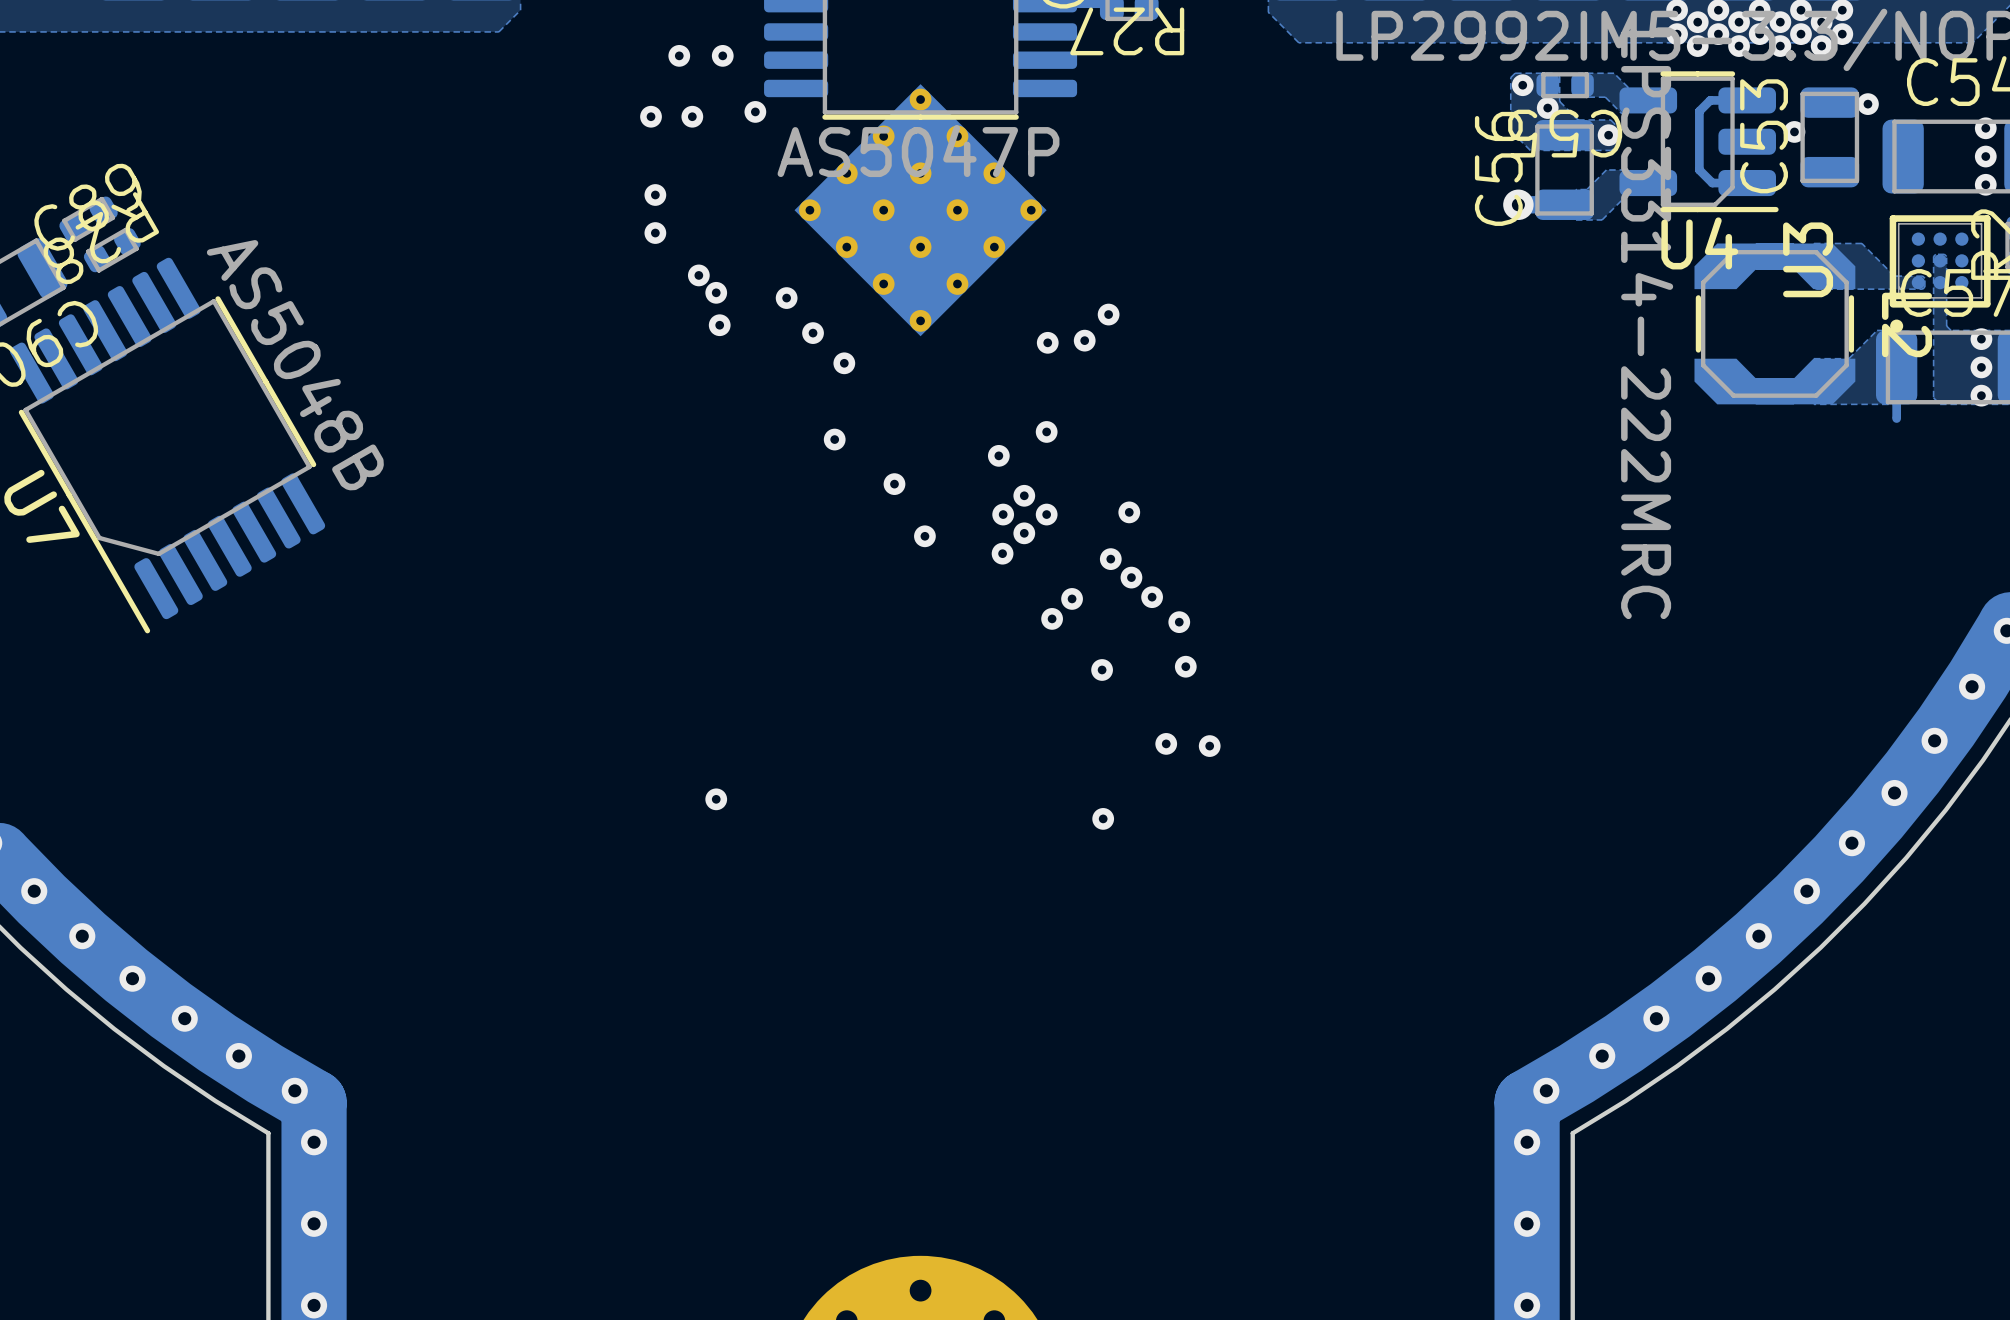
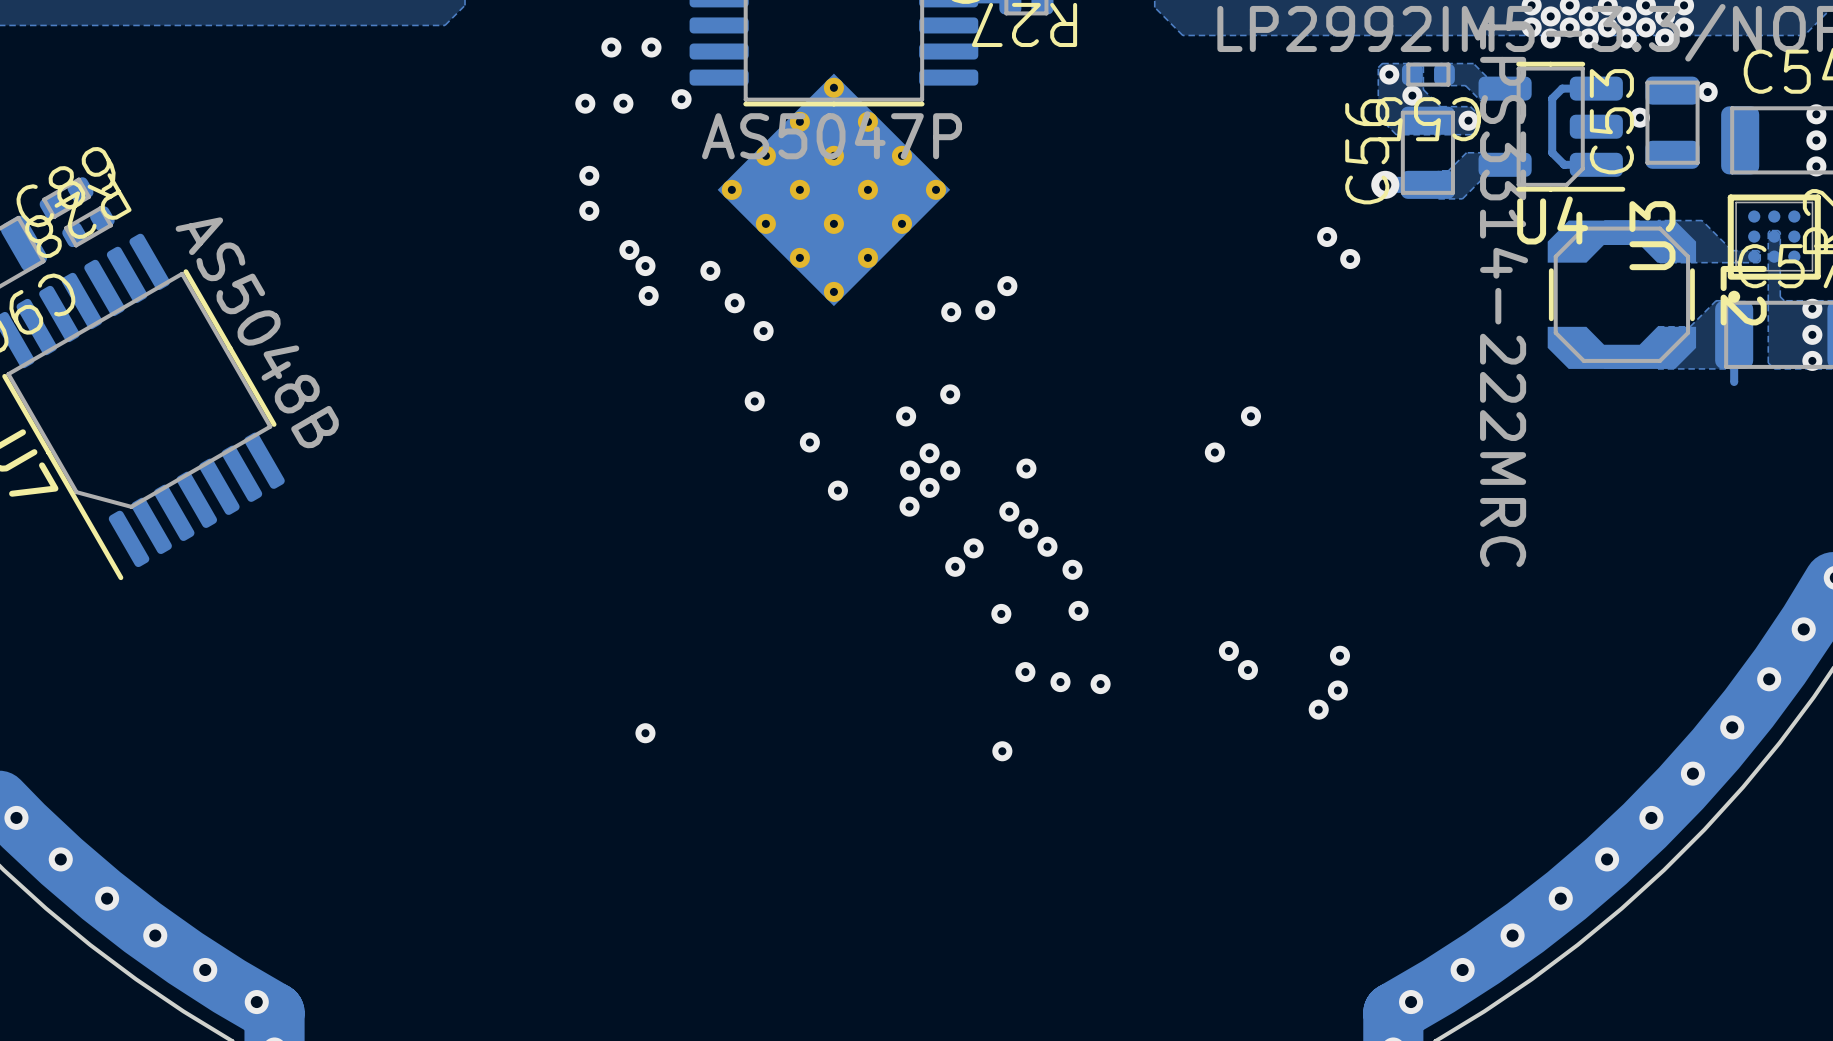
via: none -> (1327, 236)
via: none -> (1350, 259)
via: none -> (1250, 416)
via: none -> (1214, 452)
via: none -> (1228, 651)
via: none -> (1339, 655)
via: none -> (1247, 670)
via: none -> (1025, 672)
via: none -> (1337, 690)
via: none -> (1318, 709)

